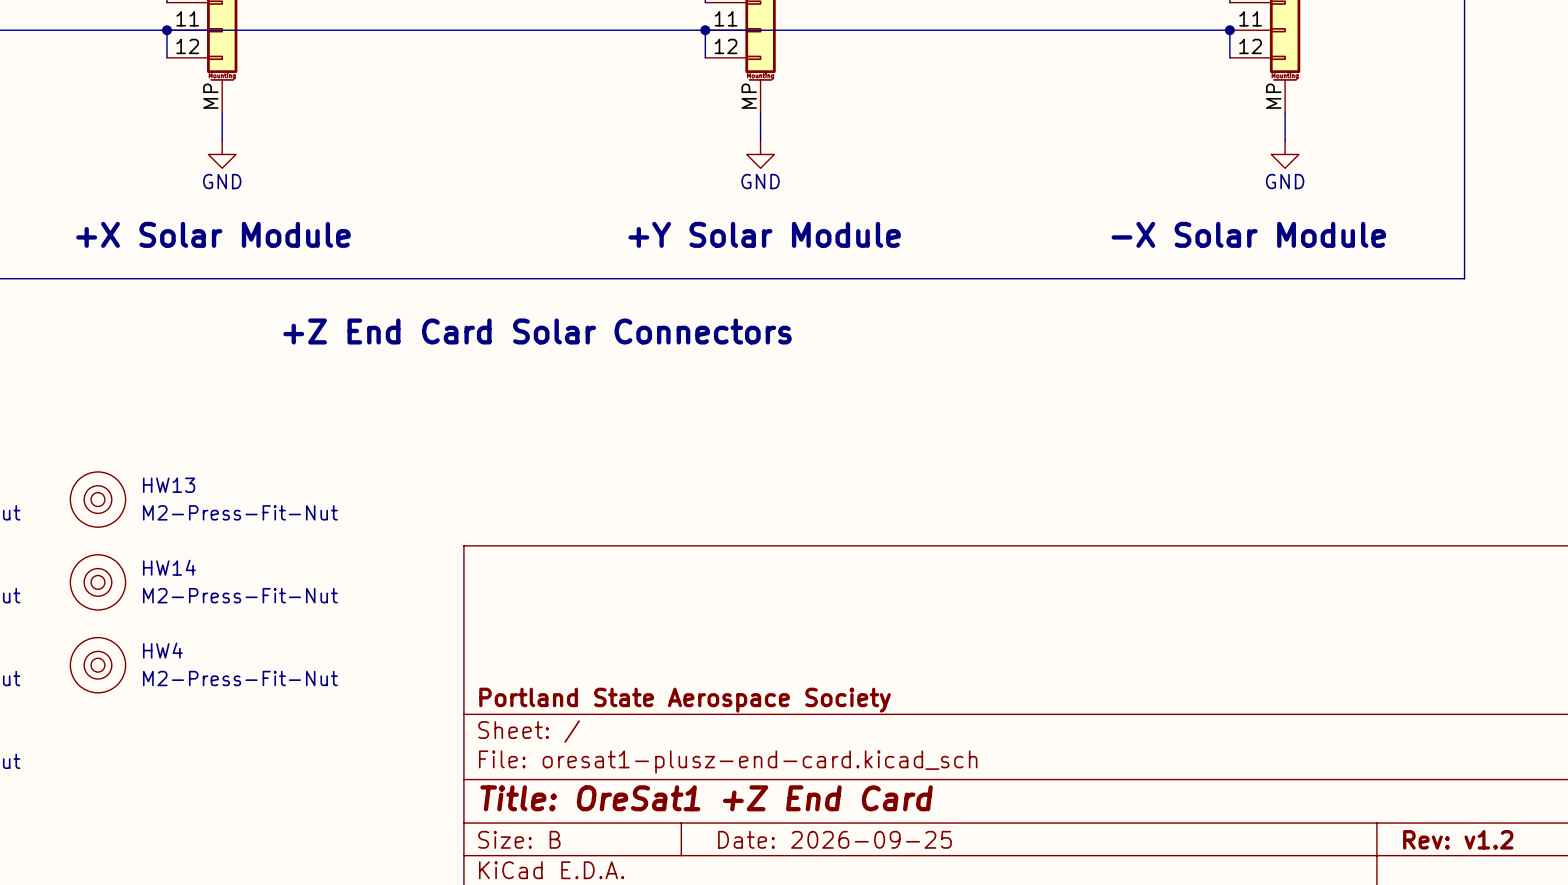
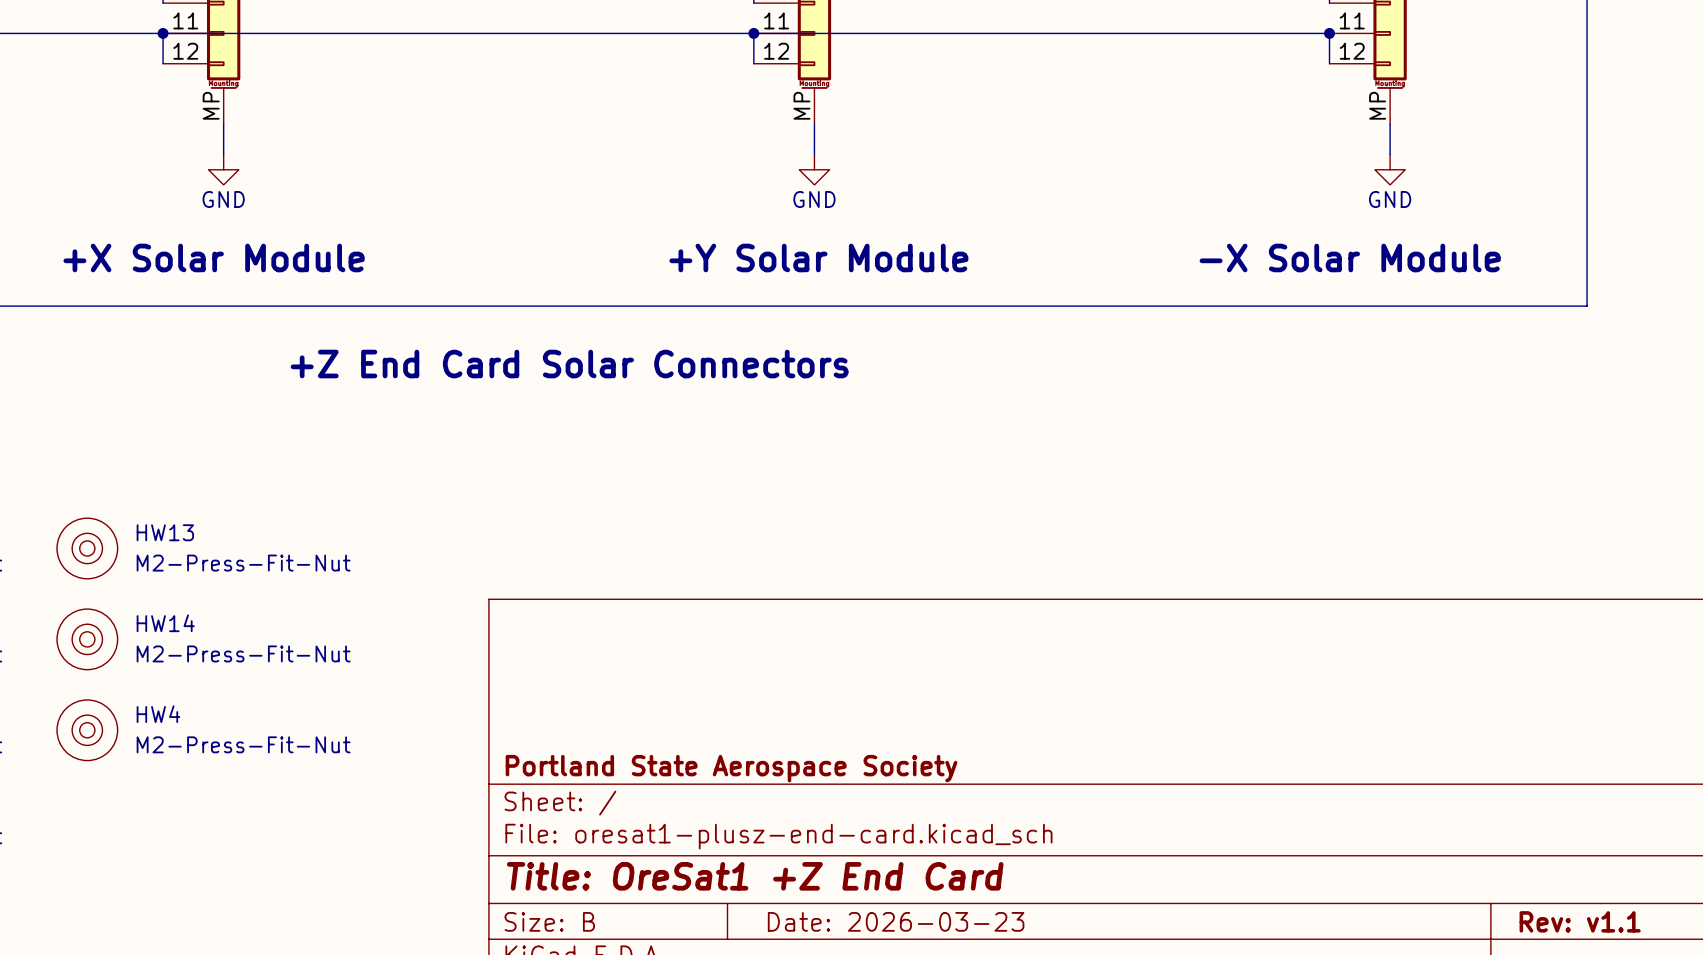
title block: Date: 2026-09-25 (834, 839) -> Date: 2026-03-23 (896, 921)
title block: Rev: v1.2 (1458, 839) -> Rev: v1.1 (1580, 921)

